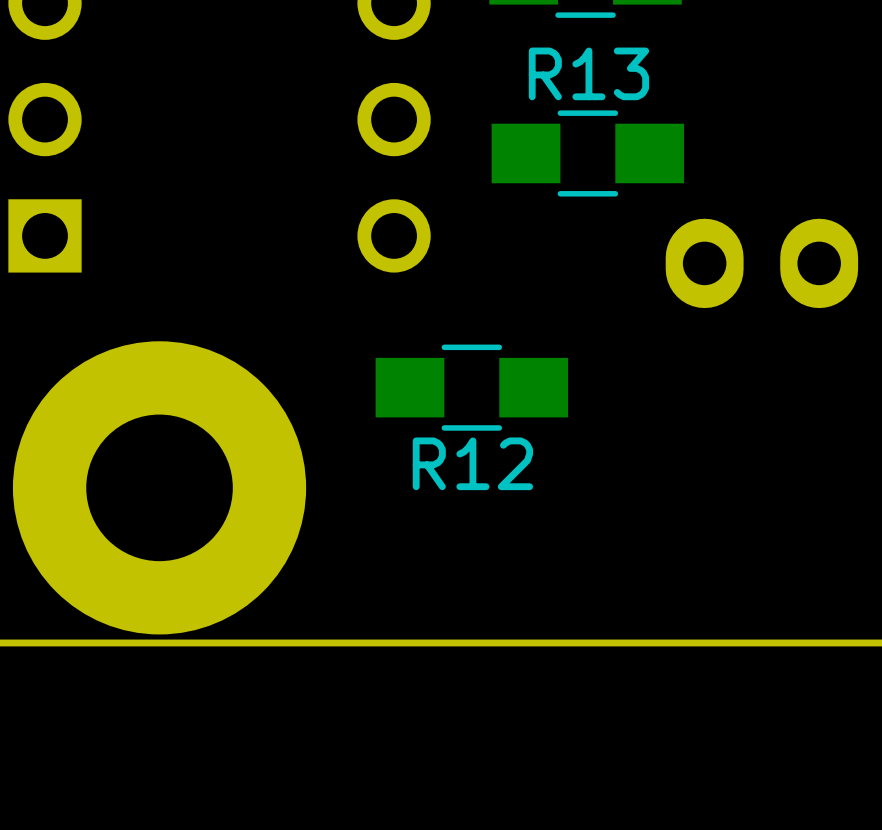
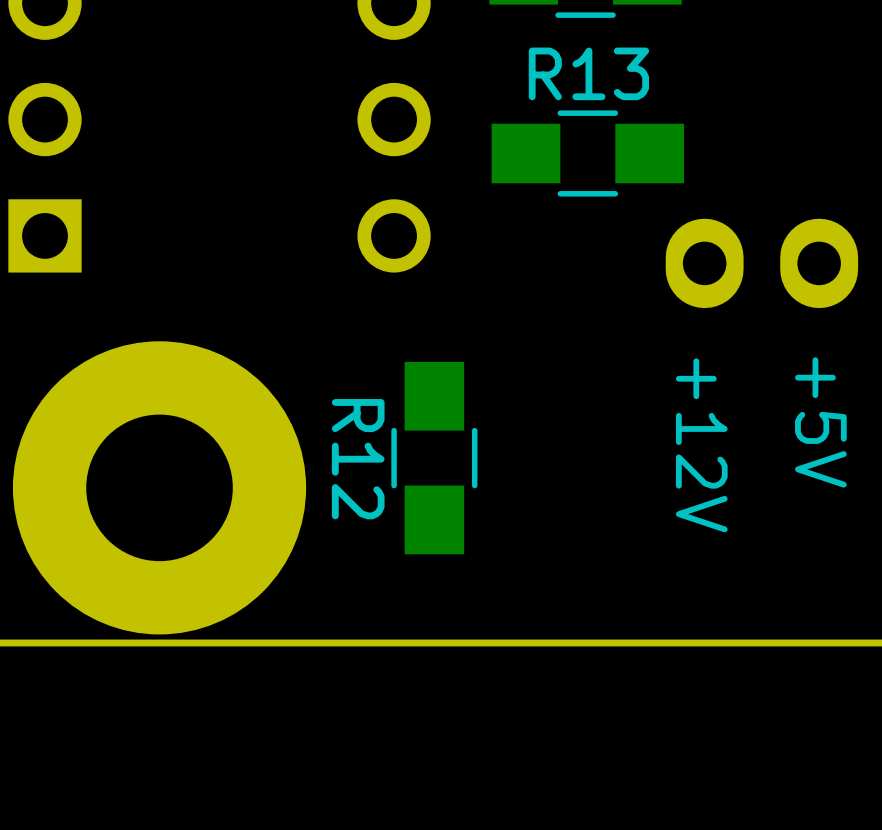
R12 rotation: 0° (471, 387) -> 90° clockwise (434, 458)
text: none -> +5V (820, 422)
text: none -> +12V (701, 445)

